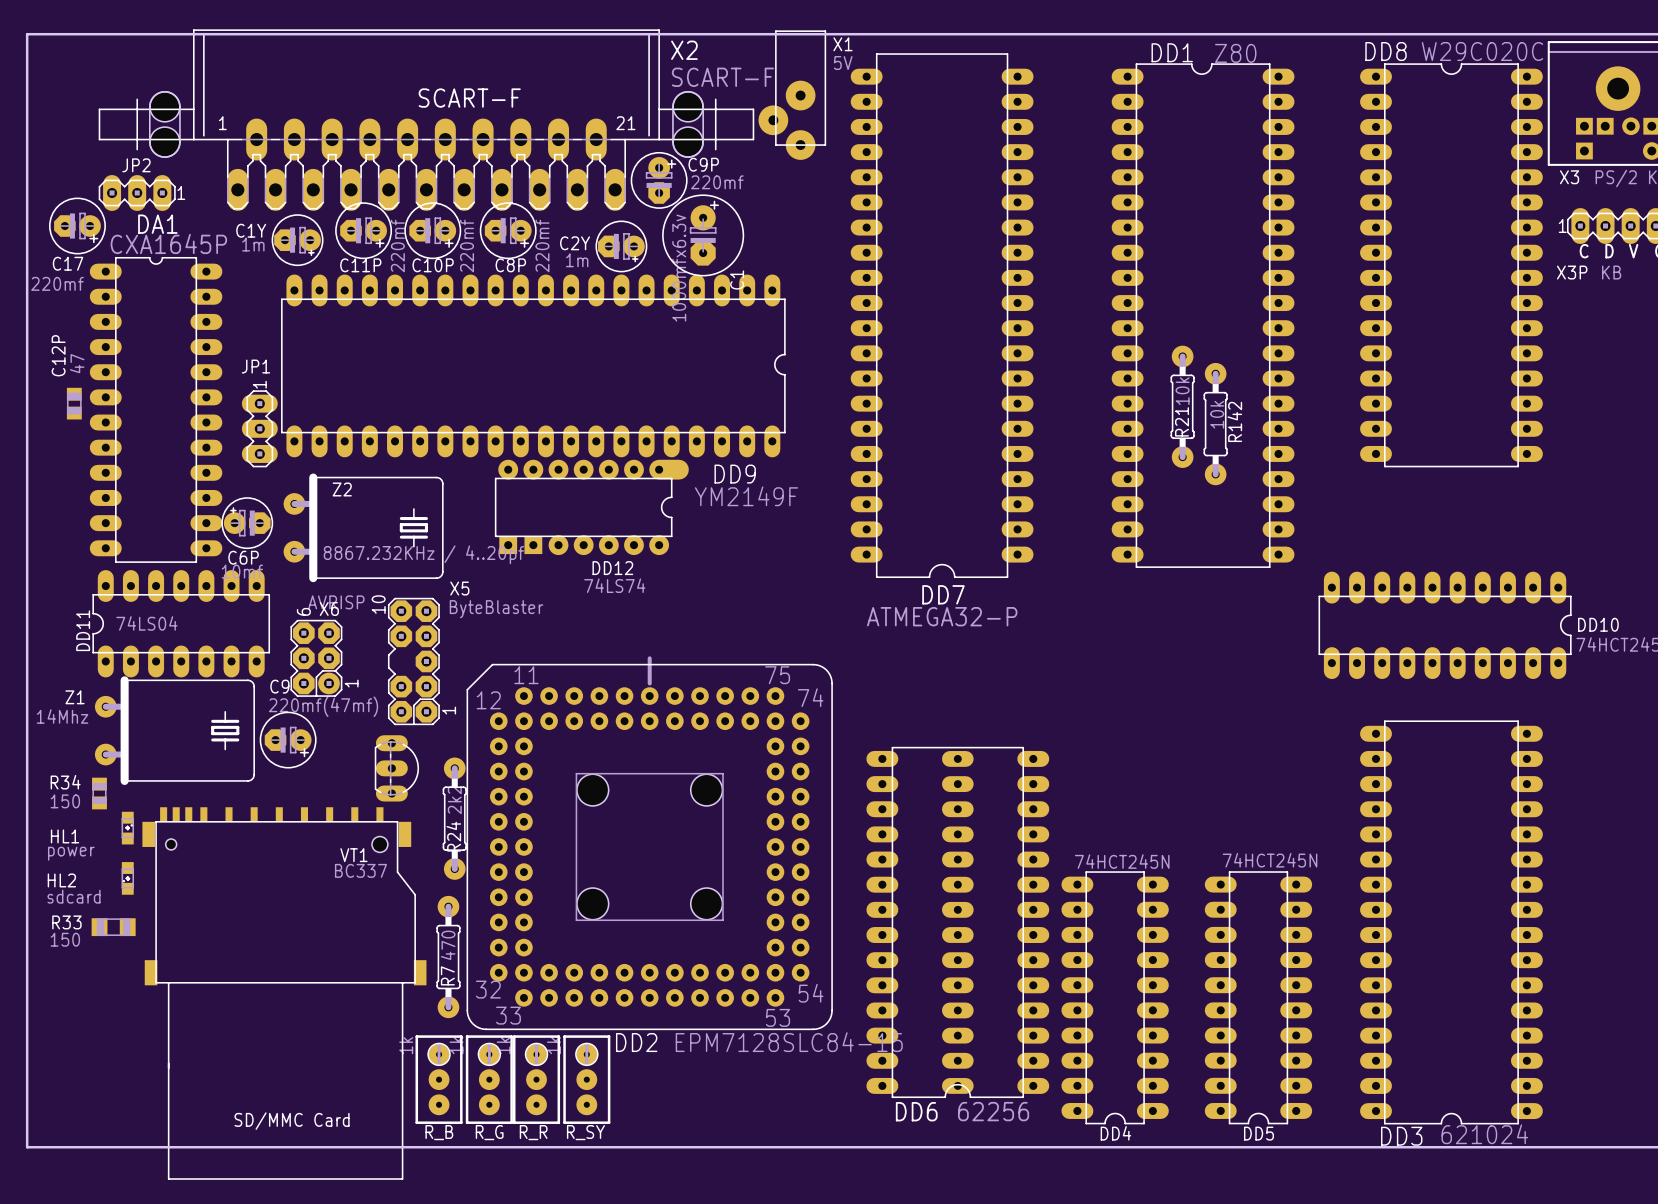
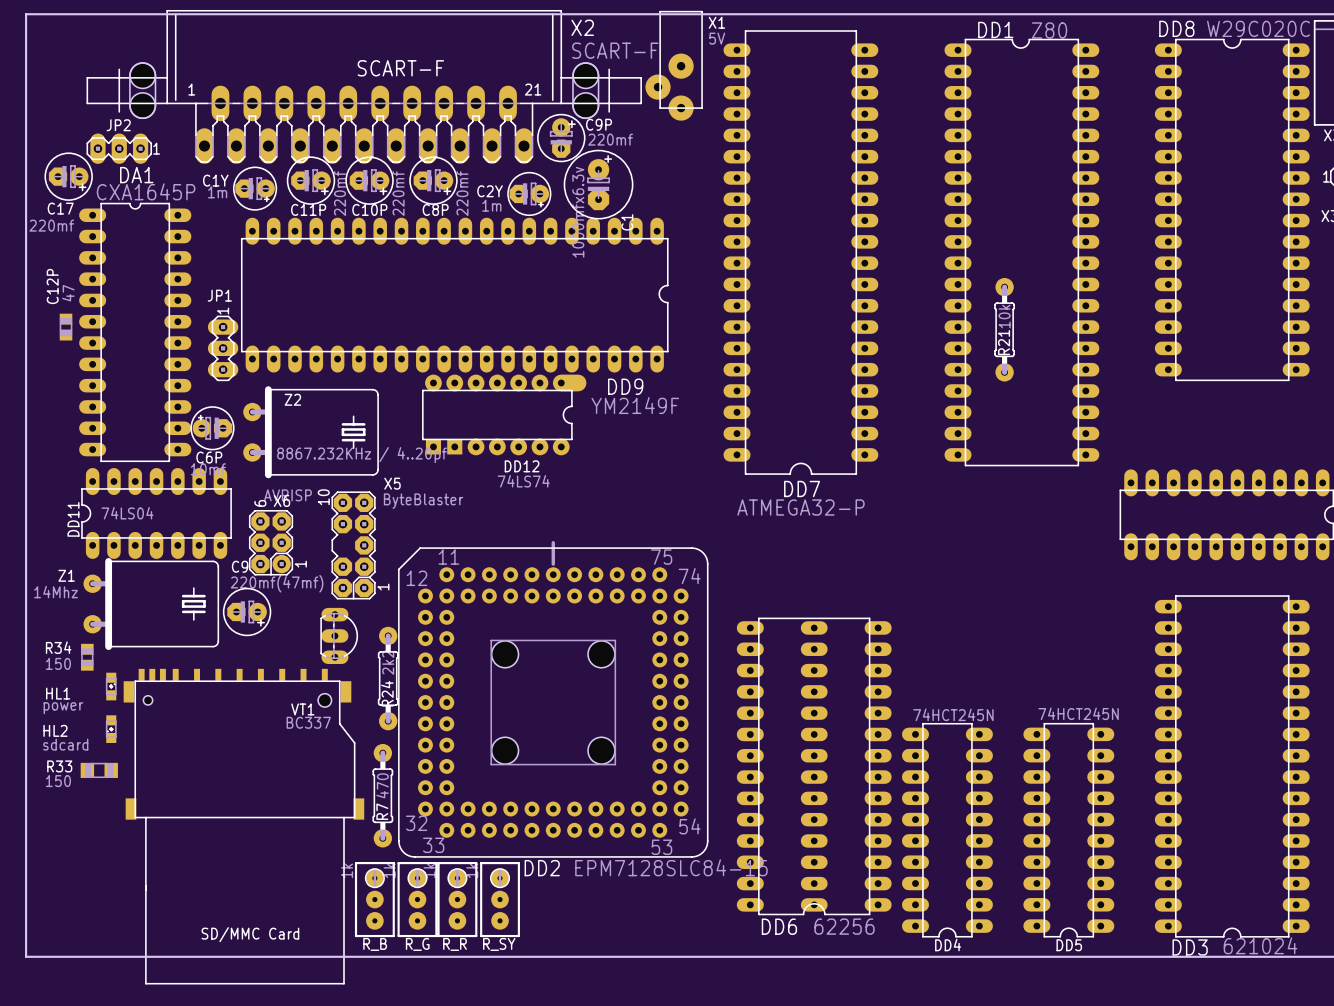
R142: 10k (1215, 424) -> none

